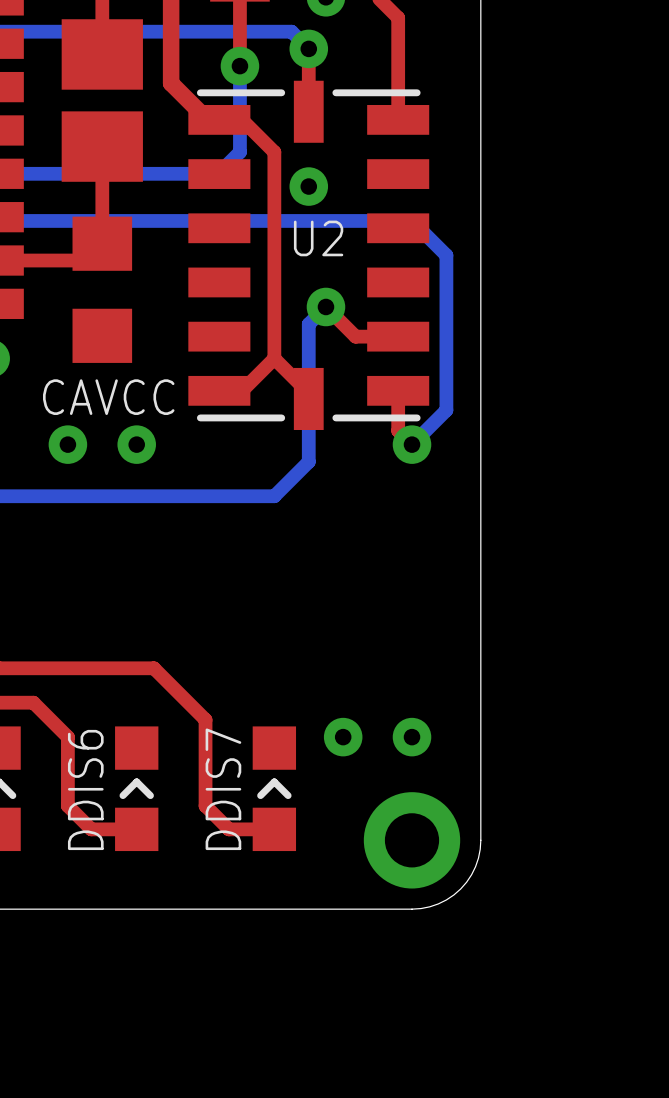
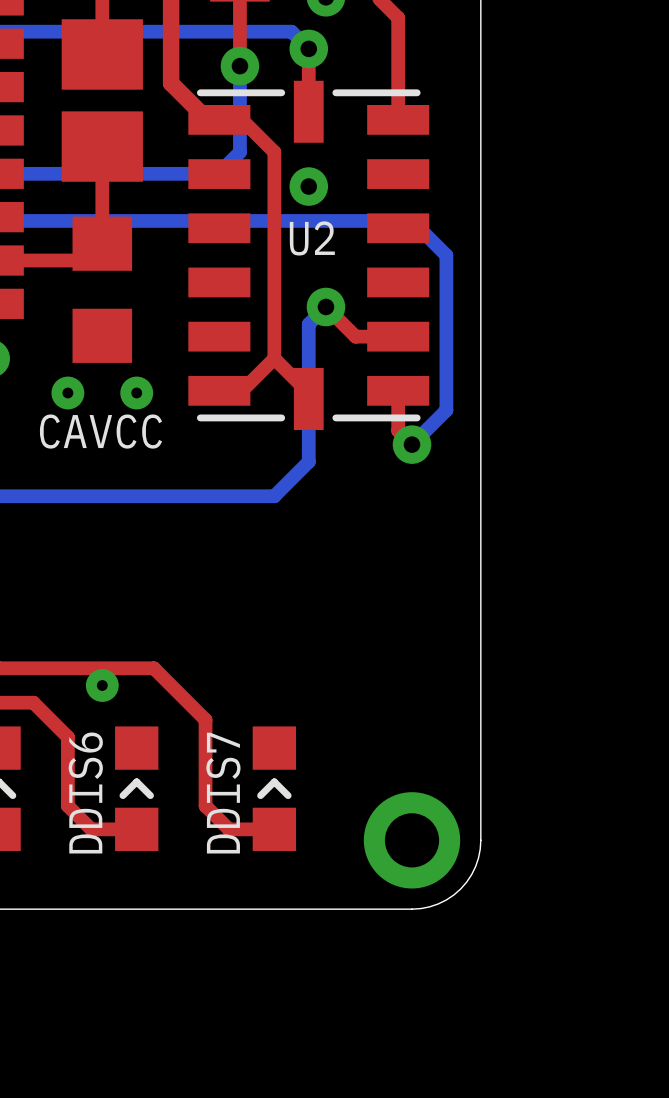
via: none -> (67, 393)
via: none -> (136, 393)
CAVCC name position: CAVCC (108, 397) -> CAVCC (100, 431)
via: (67, 444) -> none
via: (136, 444) -> none
via: none -> (102, 685)
via: (343, 737) -> none
via: (412, 737) -> none

